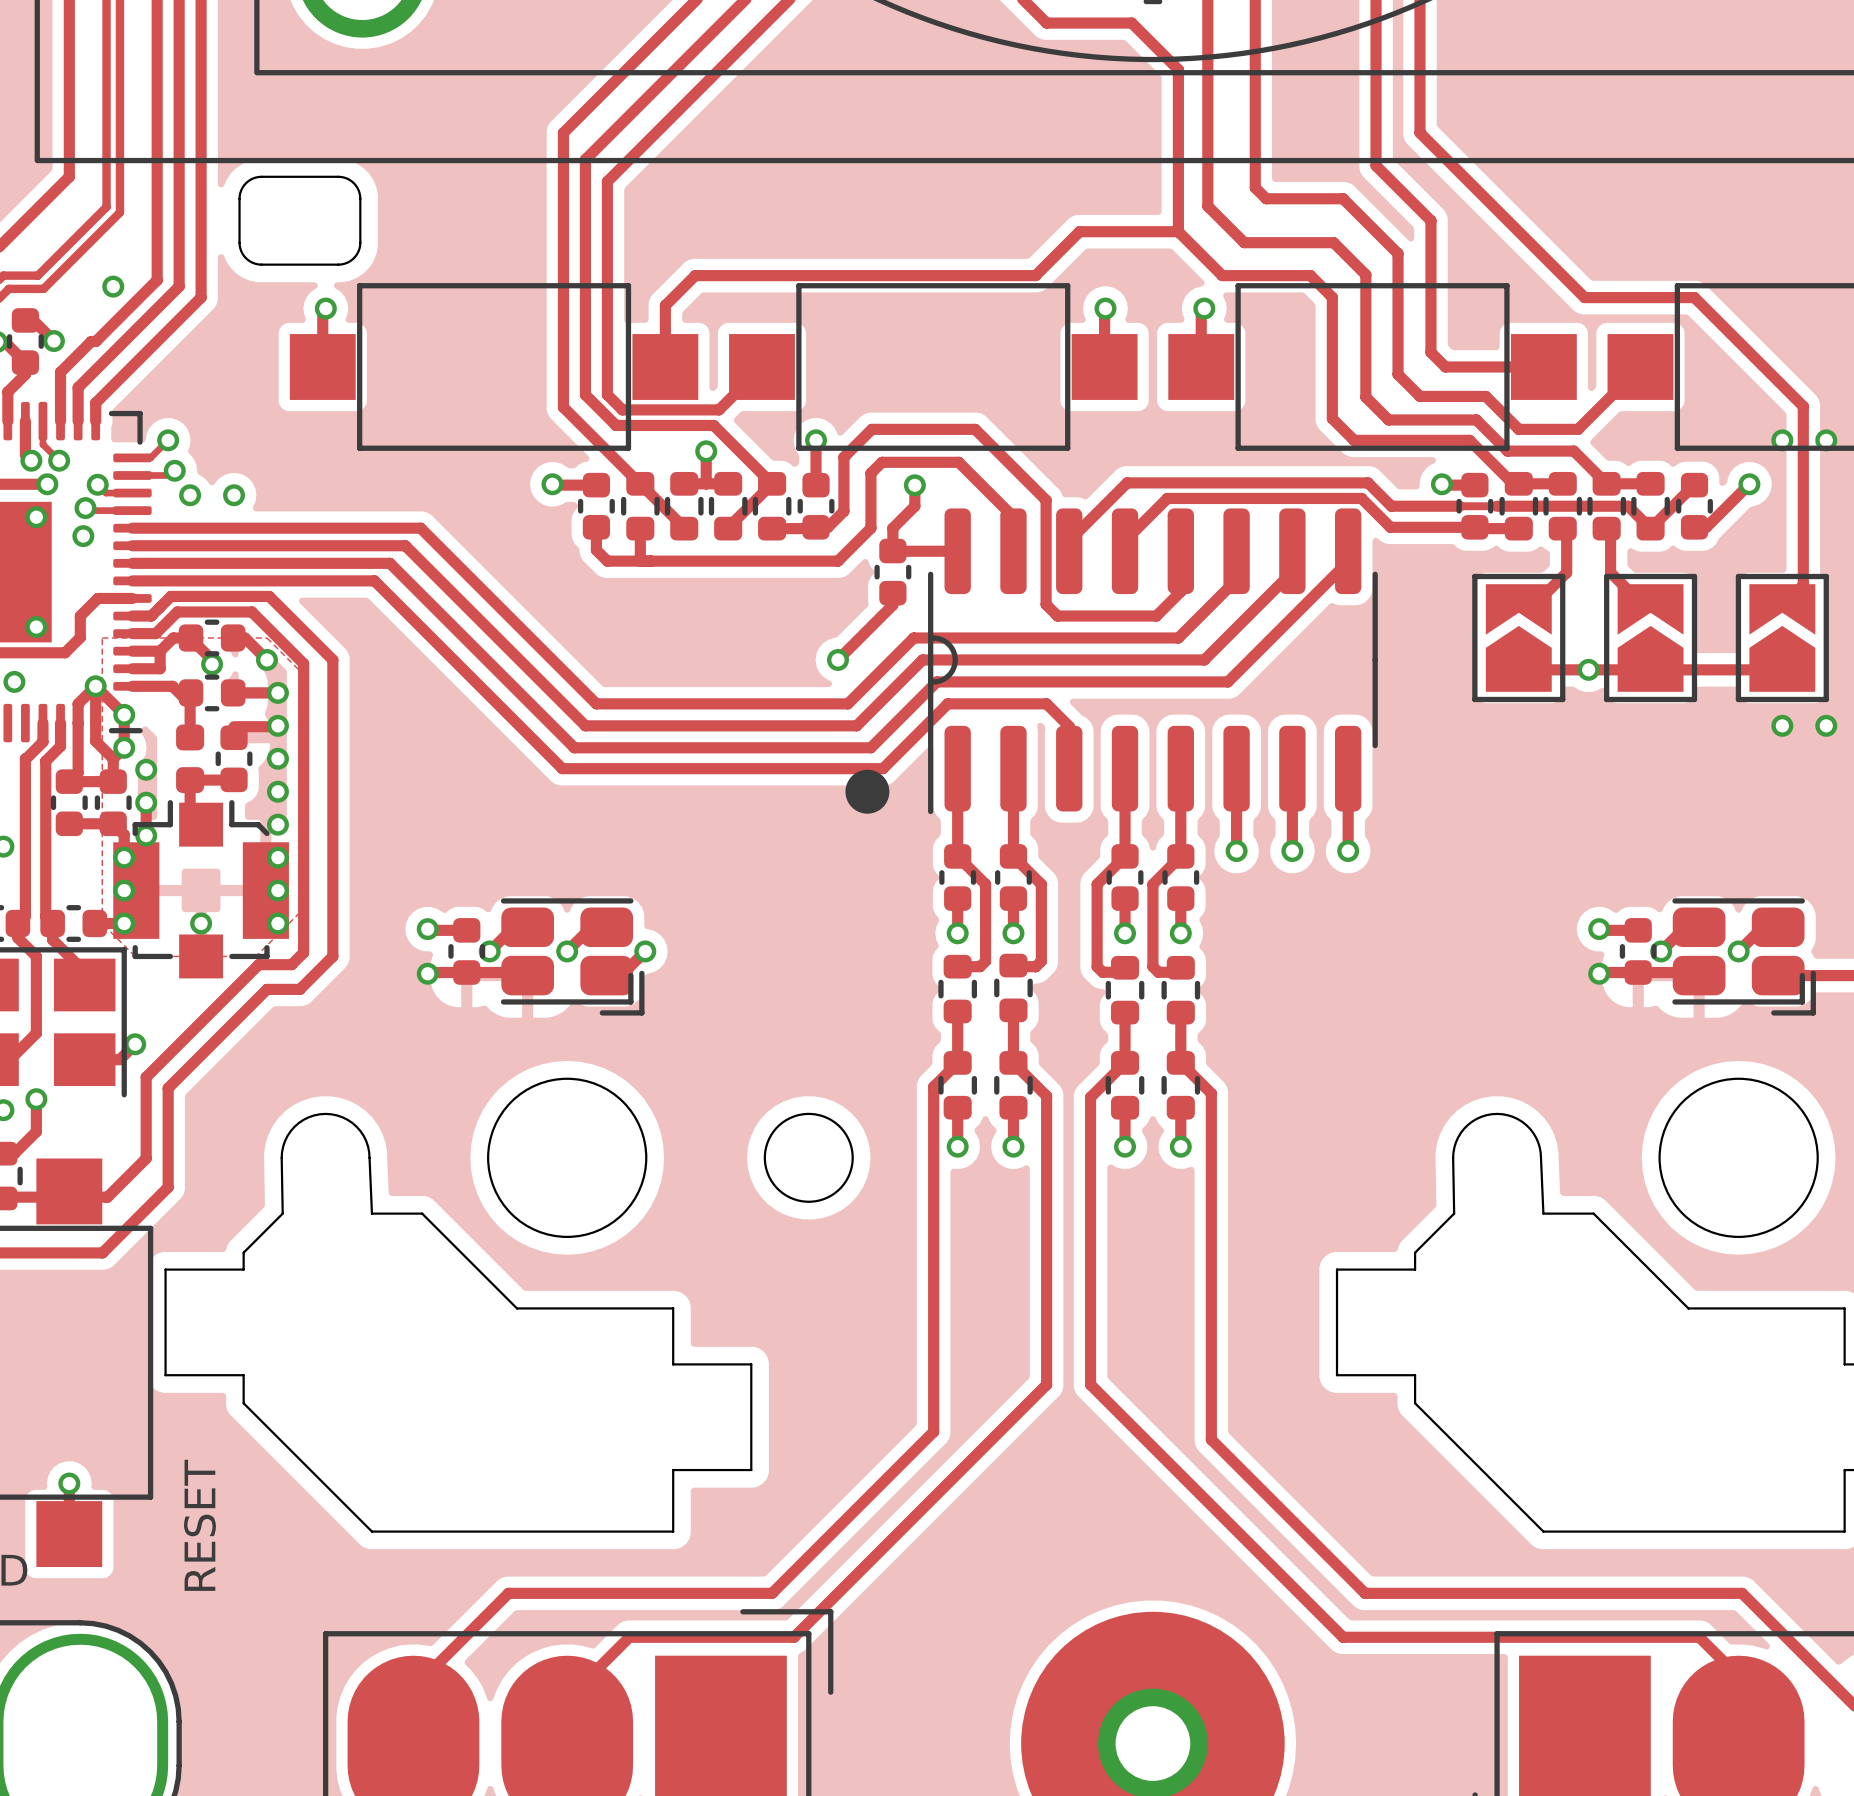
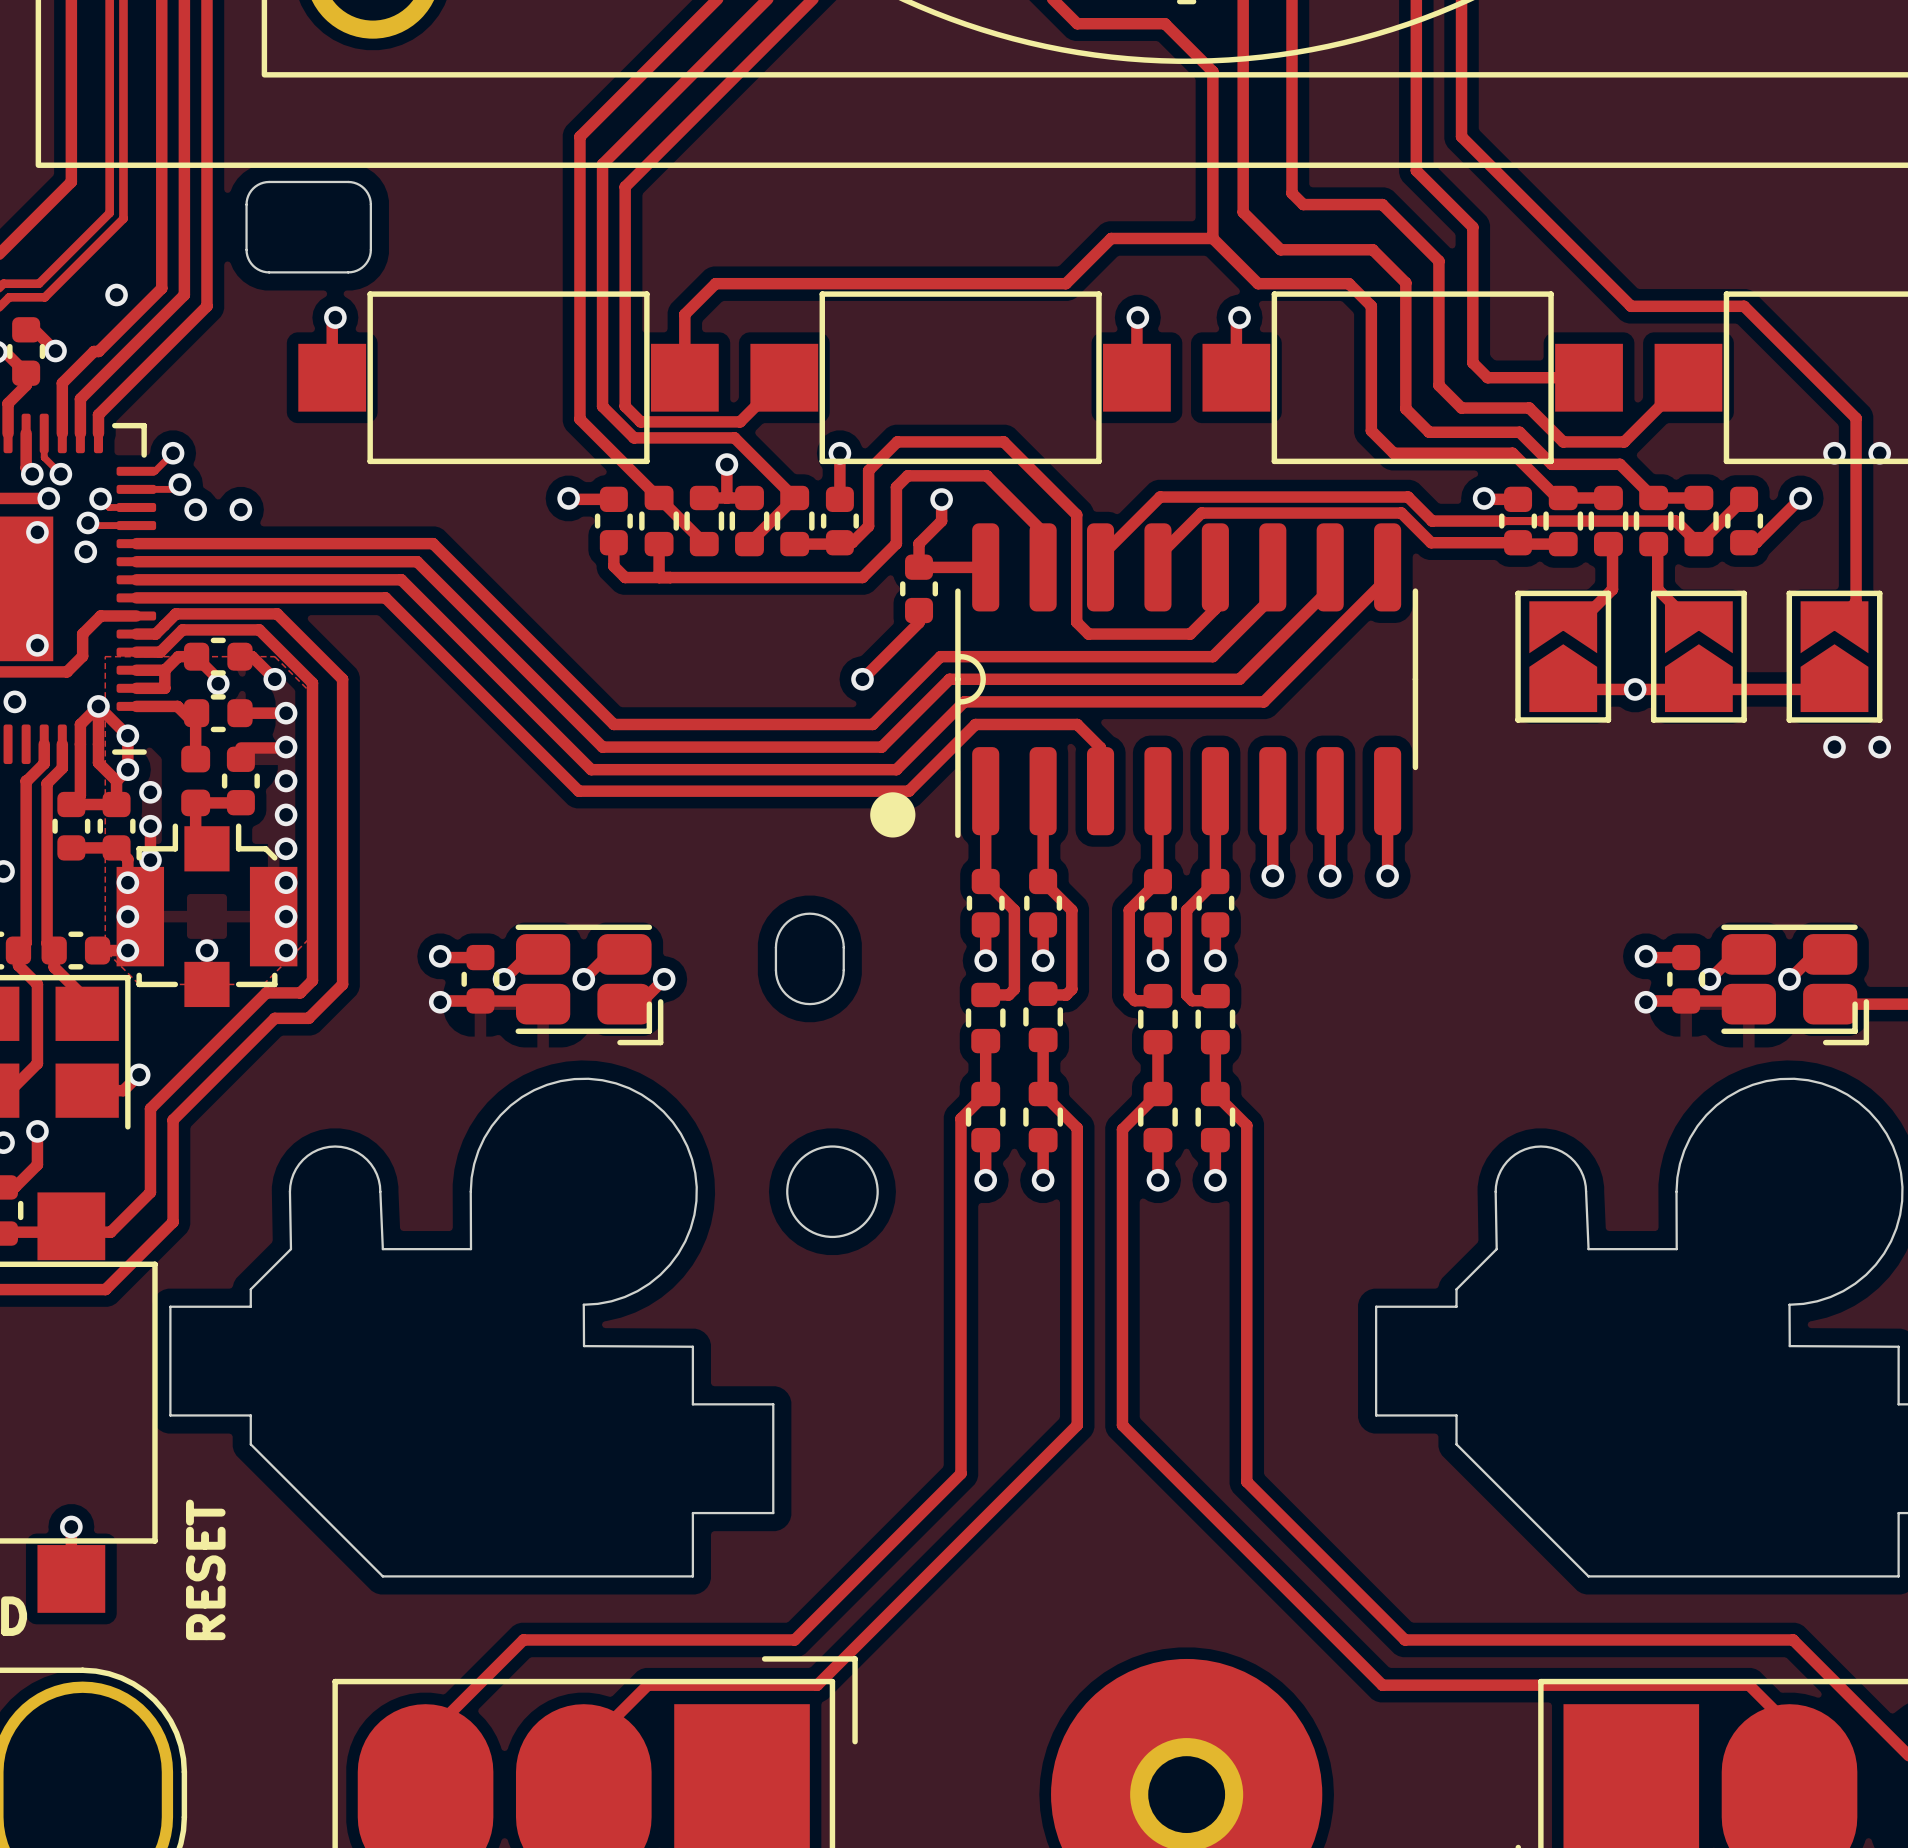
board edge: none -> (775, 947) (777, 978) (782, 990) (792, 999) (805, 1003) (818, 1002) (830, 997) (839, 987) (843, 974) (843, 943) (839, 931) (829, 919) (813, 913) (794, 917) (779, 931) (775, 947)
round board edge: [487, 1077, 648, 1238] -> none
round board edge: [1658, 1077, 1819, 1238] -> none
board edge: (422, 1213) (516, 1308) (673, 1308) -> (434, 1249) (471, 1249) (470, 1191) (474, 1163) (478, 1150) (491, 1126) (510, 1105) (534, 1090) (560, 1081) (588, 1078) (602, 1080) (629, 1088) (653, 1102) (672, 1122) (680, 1133) (687, 1146) (695, 1173) (696, 1187) (694, 1214) (685, 1241) (670, 1264) (660, 1274) (649, 1283) (624, 1297) (611, 1301) (583, 1304) (584, 1346) (692, 1346)
board edge: (1593, 1213) (1688, 1308) (1844, 1308) -> (1640, 1249) (1676, 1249) (1676, 1191) (1679, 1163) (1684, 1150) (1697, 1126) (1716, 1105) (1739, 1090) (1766, 1081) (1794, 1078) (1821, 1083) (1834, 1088) (1847, 1094) (1869, 1111) (1886, 1133) (1897, 1159) (1901, 1173) (1902, 1187) (1900, 1214) (1896, 1228) (1884, 1253) (1866, 1274) (1855, 1283) (1843, 1291) (1817, 1301) (1789, 1304) (1789, 1346) (1898, 1346)

